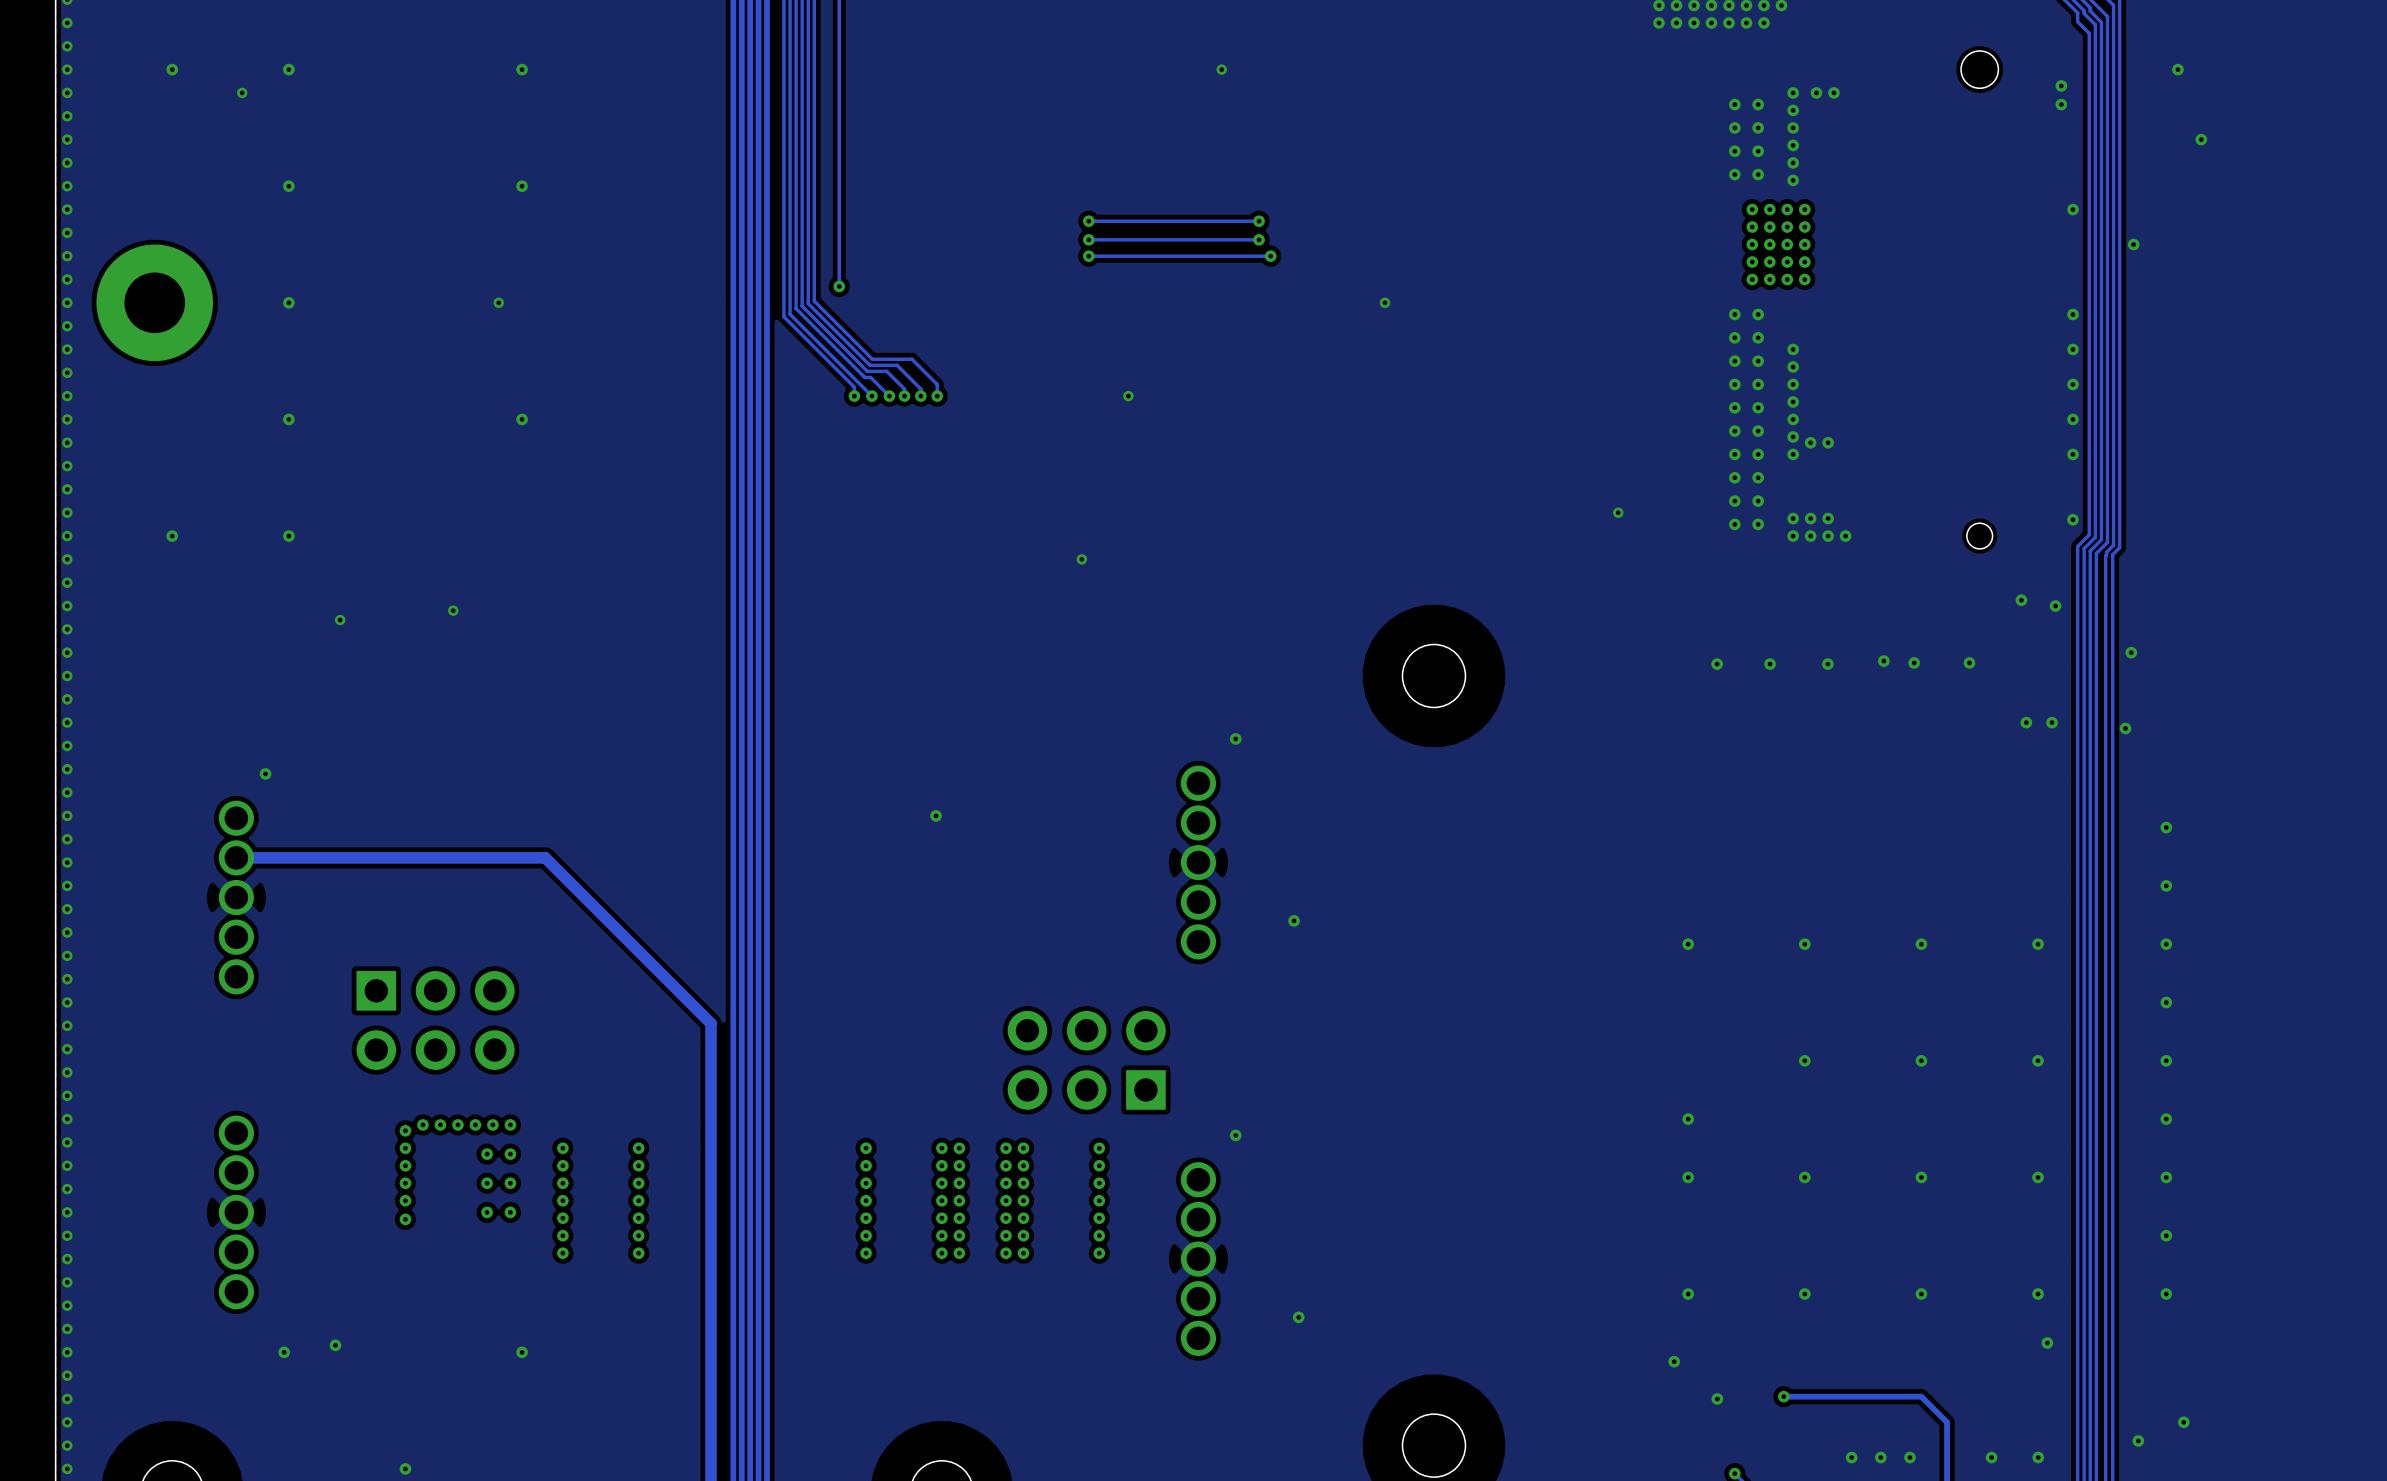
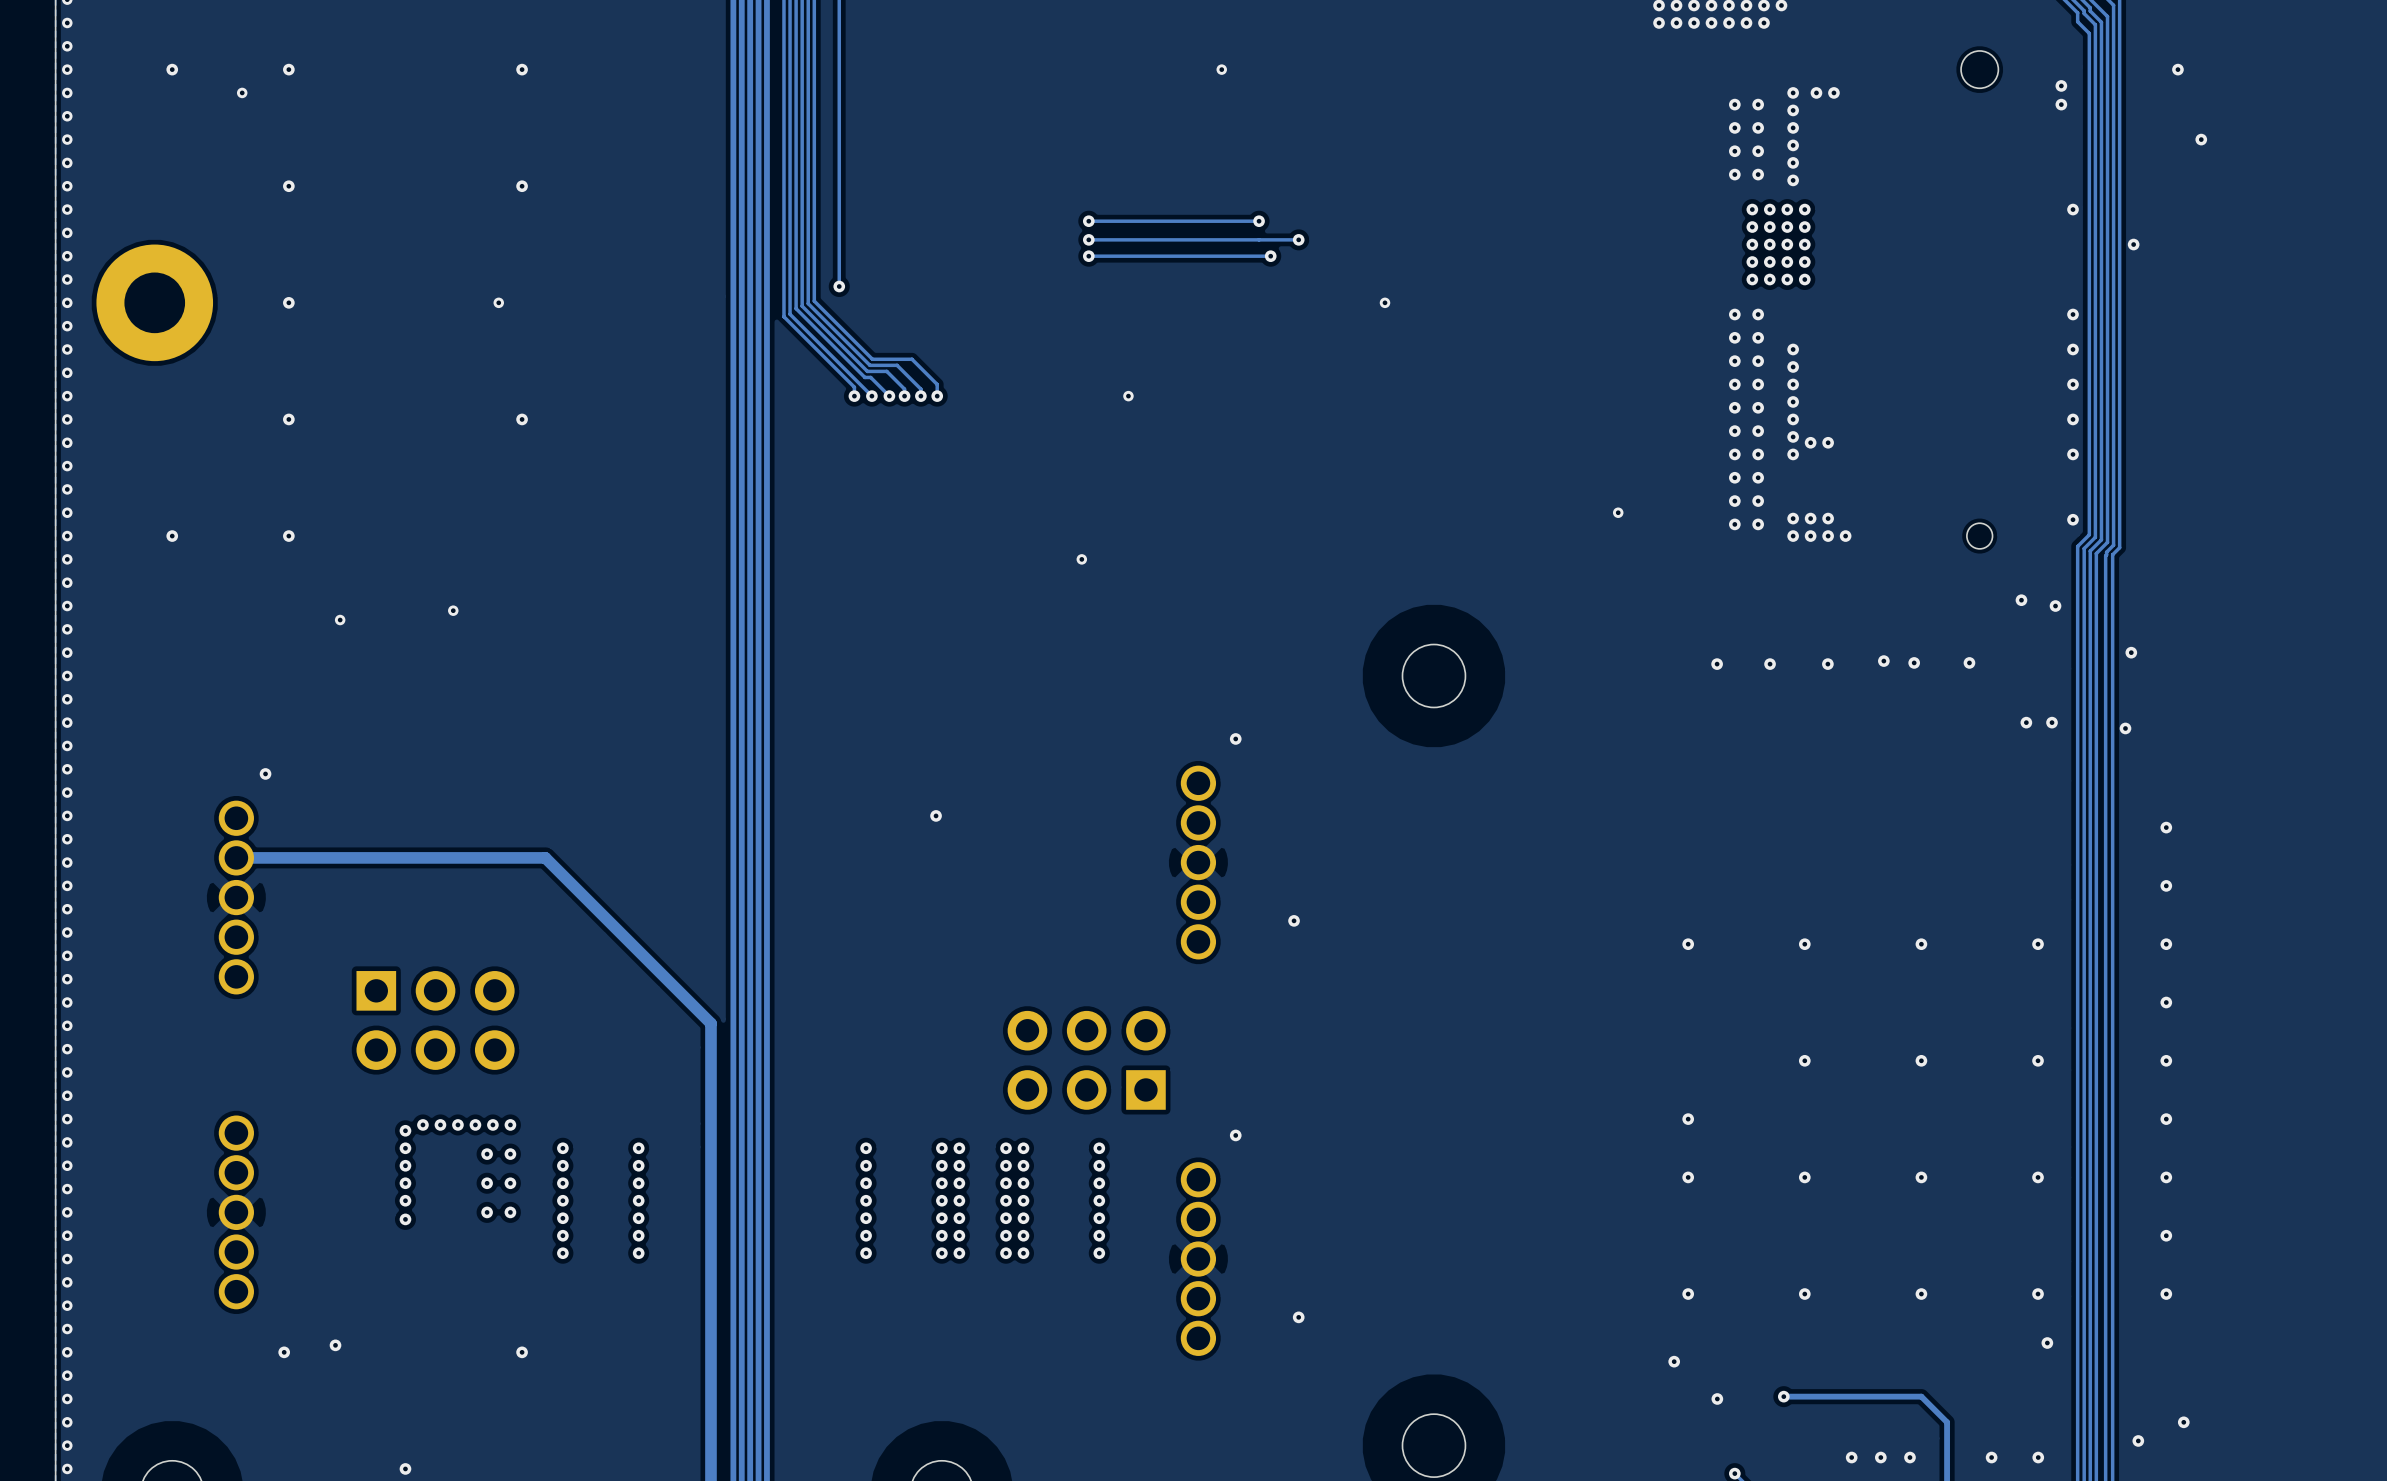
via position: (1259, 239) -> (1298, 239)
track: none -> (1298, 239) (1259, 239)

